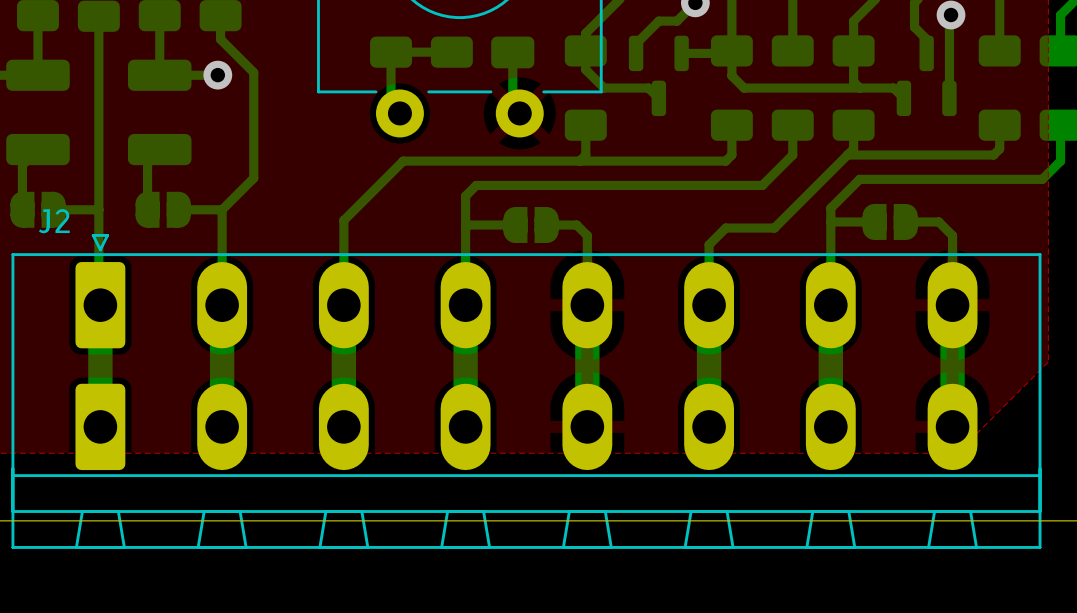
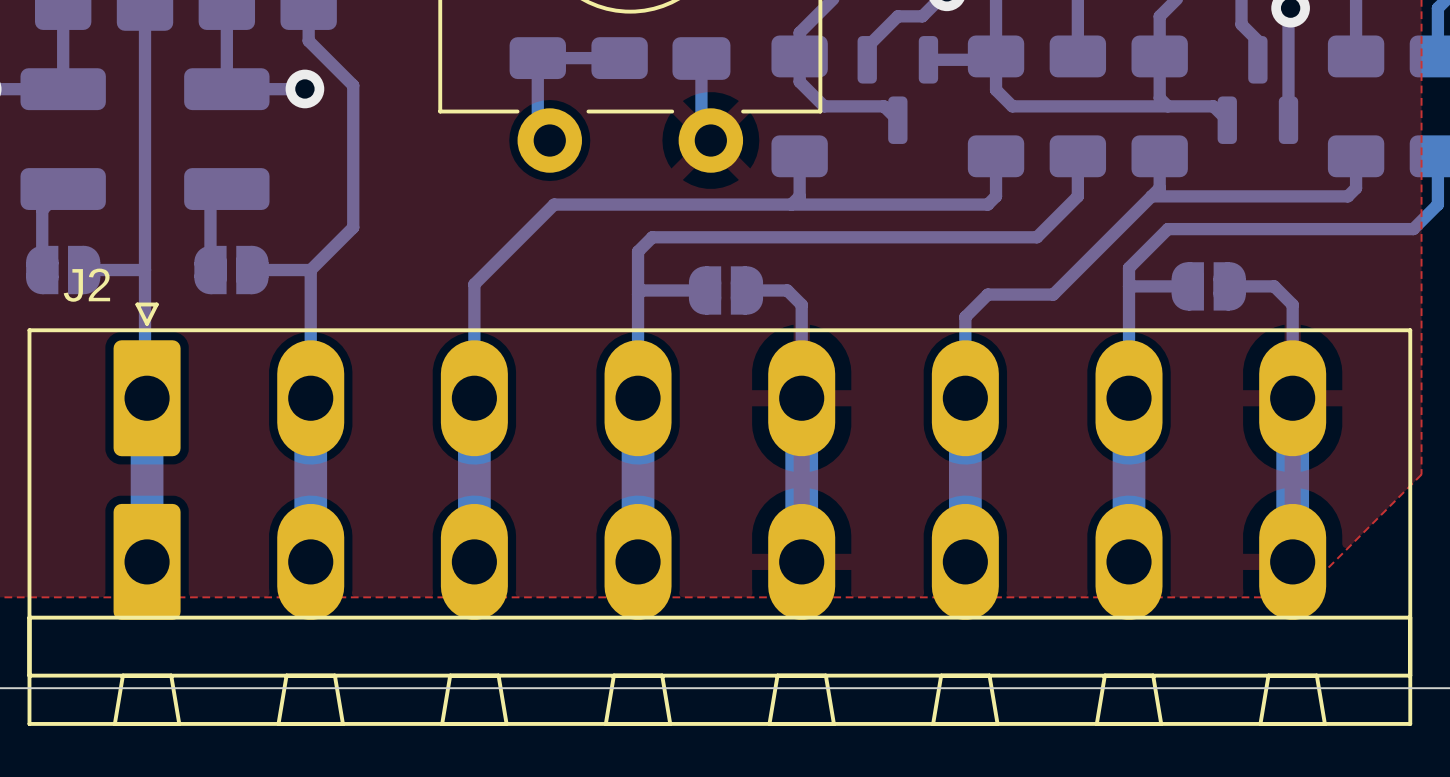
J2 footprint: [11, 234, 1042, 549] -> [27, 302, 1413, 726]

